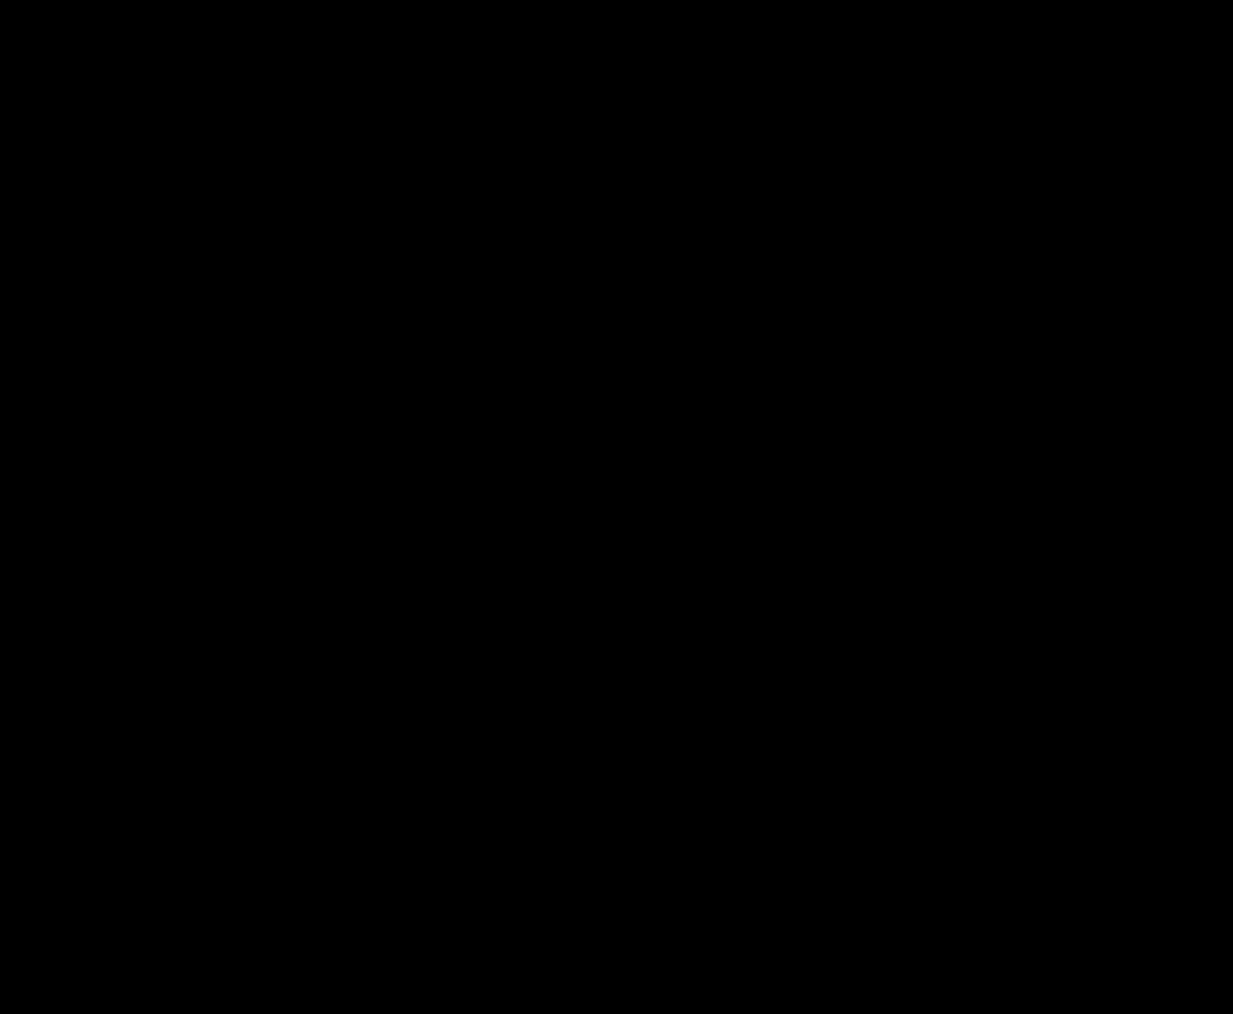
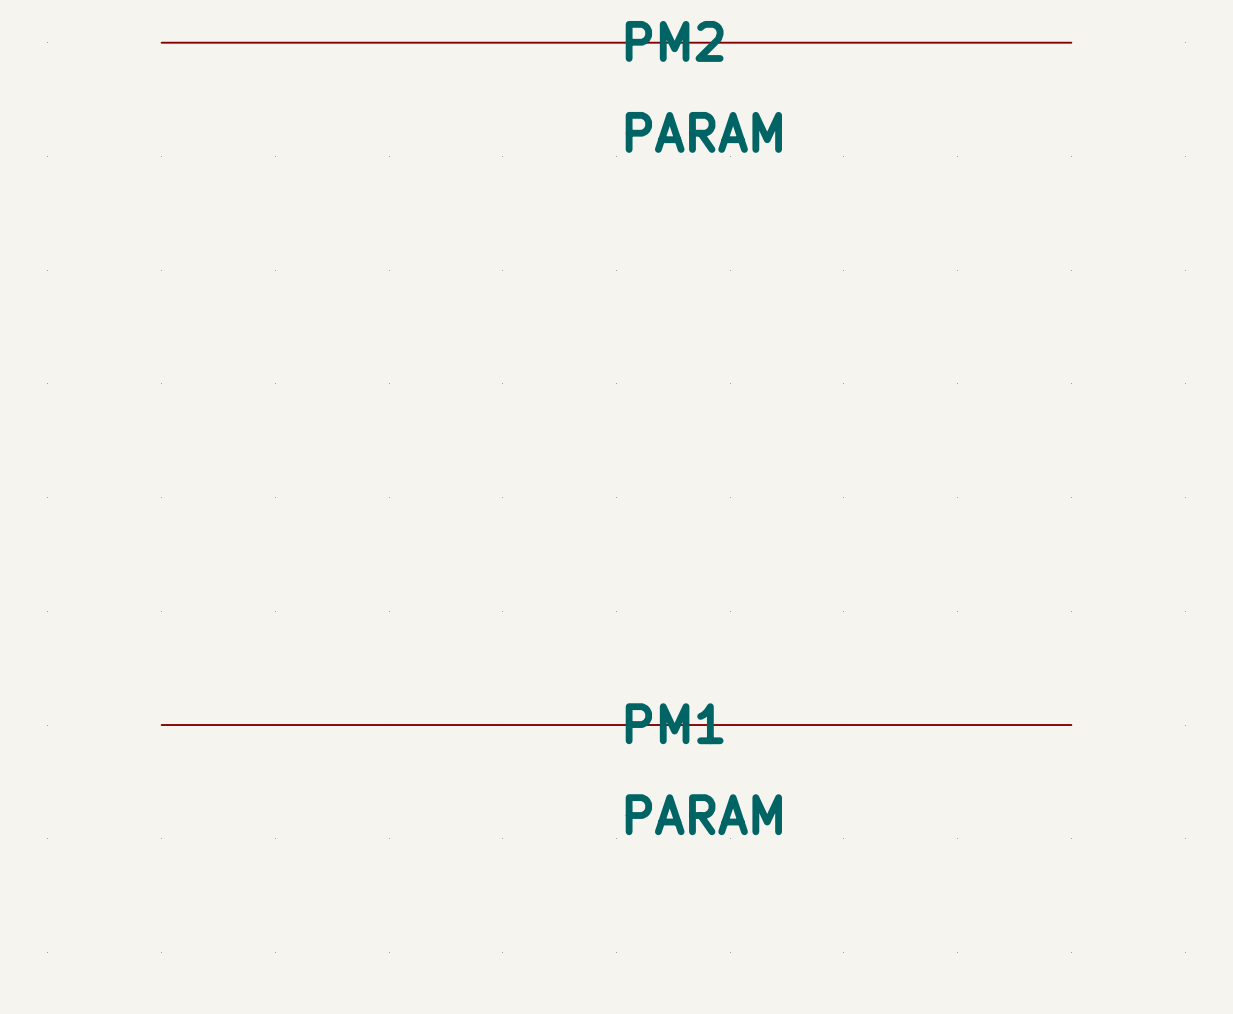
PM2: none -> PARAM (616, 42)
PM1: none -> PARAM (616, 725)

